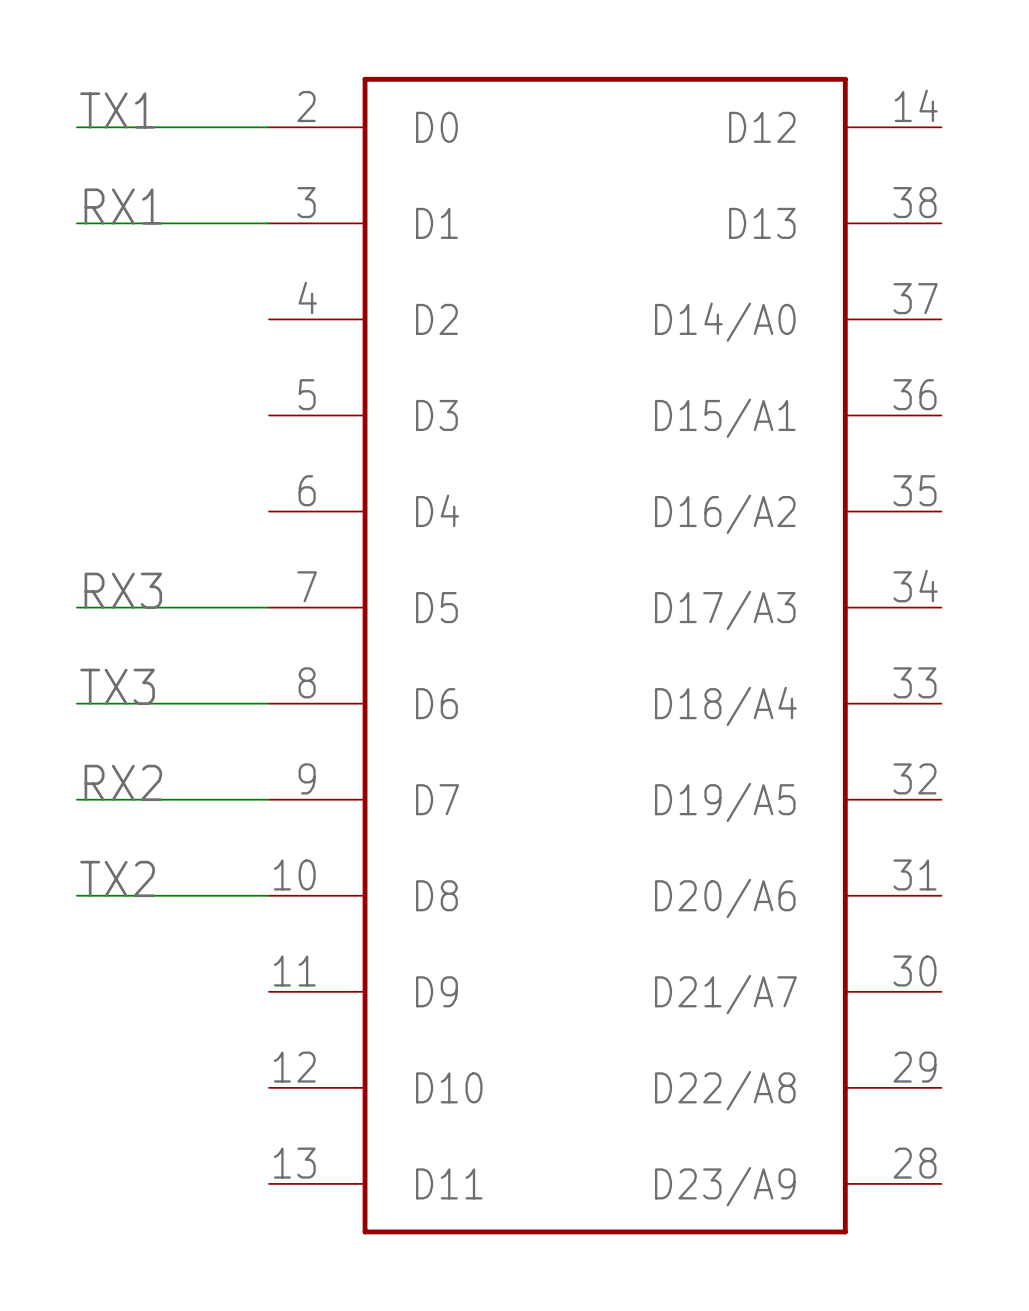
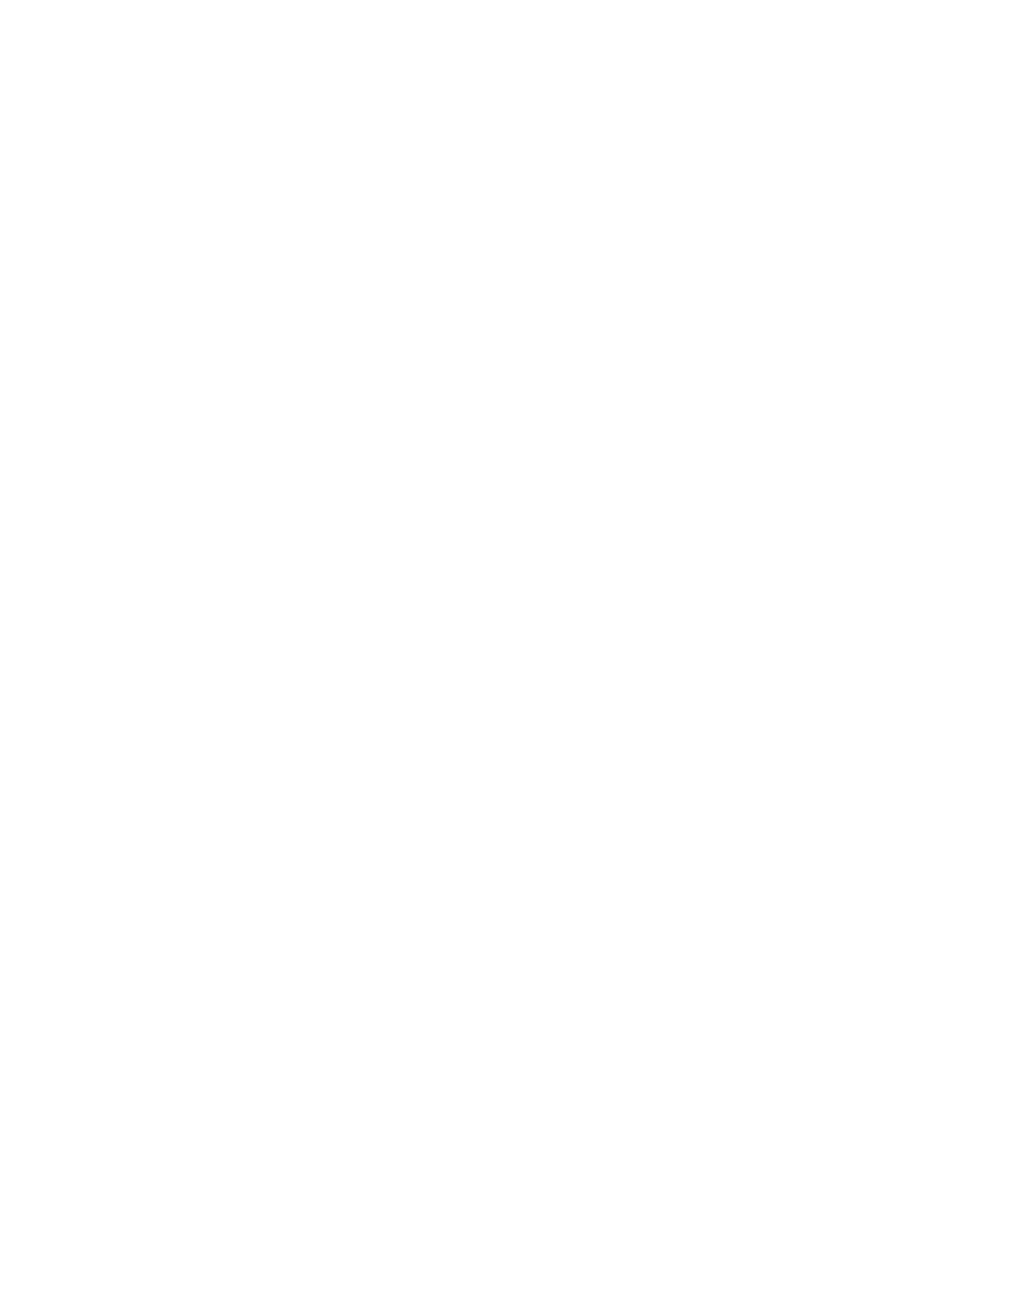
label: TX1 (117, 110) -> none
wire: (76, 127) (269, 127) -> none
label: RX1 (123, 206) -> none
wire: (76, 223) (269, 223) -> none
label: RX3 (123, 590) -> none
wire: (76, 607) (269, 607) -> none
part: (605, 655) -> none
label: TX3 (117, 686) -> none
wire: (76, 703) (269, 703) -> none
label: RX2 (123, 782) -> none
wire: (76, 799) (269, 799) -> none
label: TX2 (117, 878) -> none
wire: (76, 895) (269, 895) -> none

